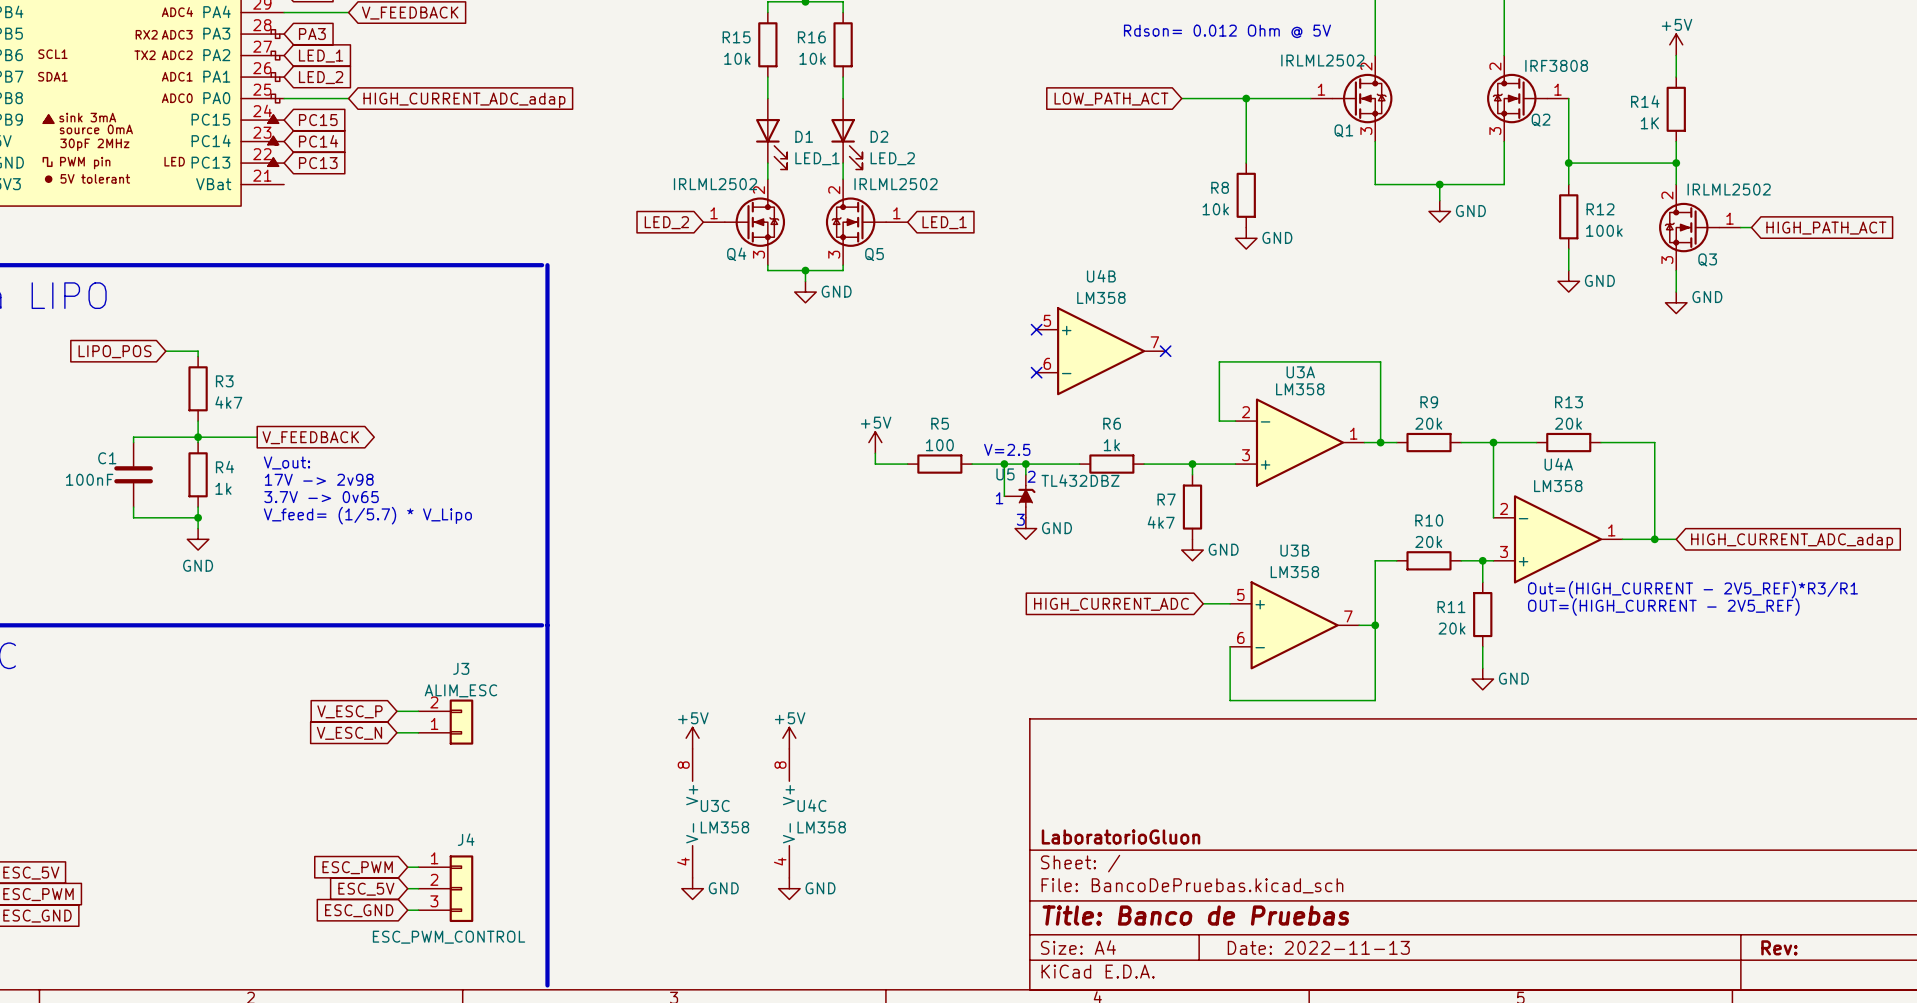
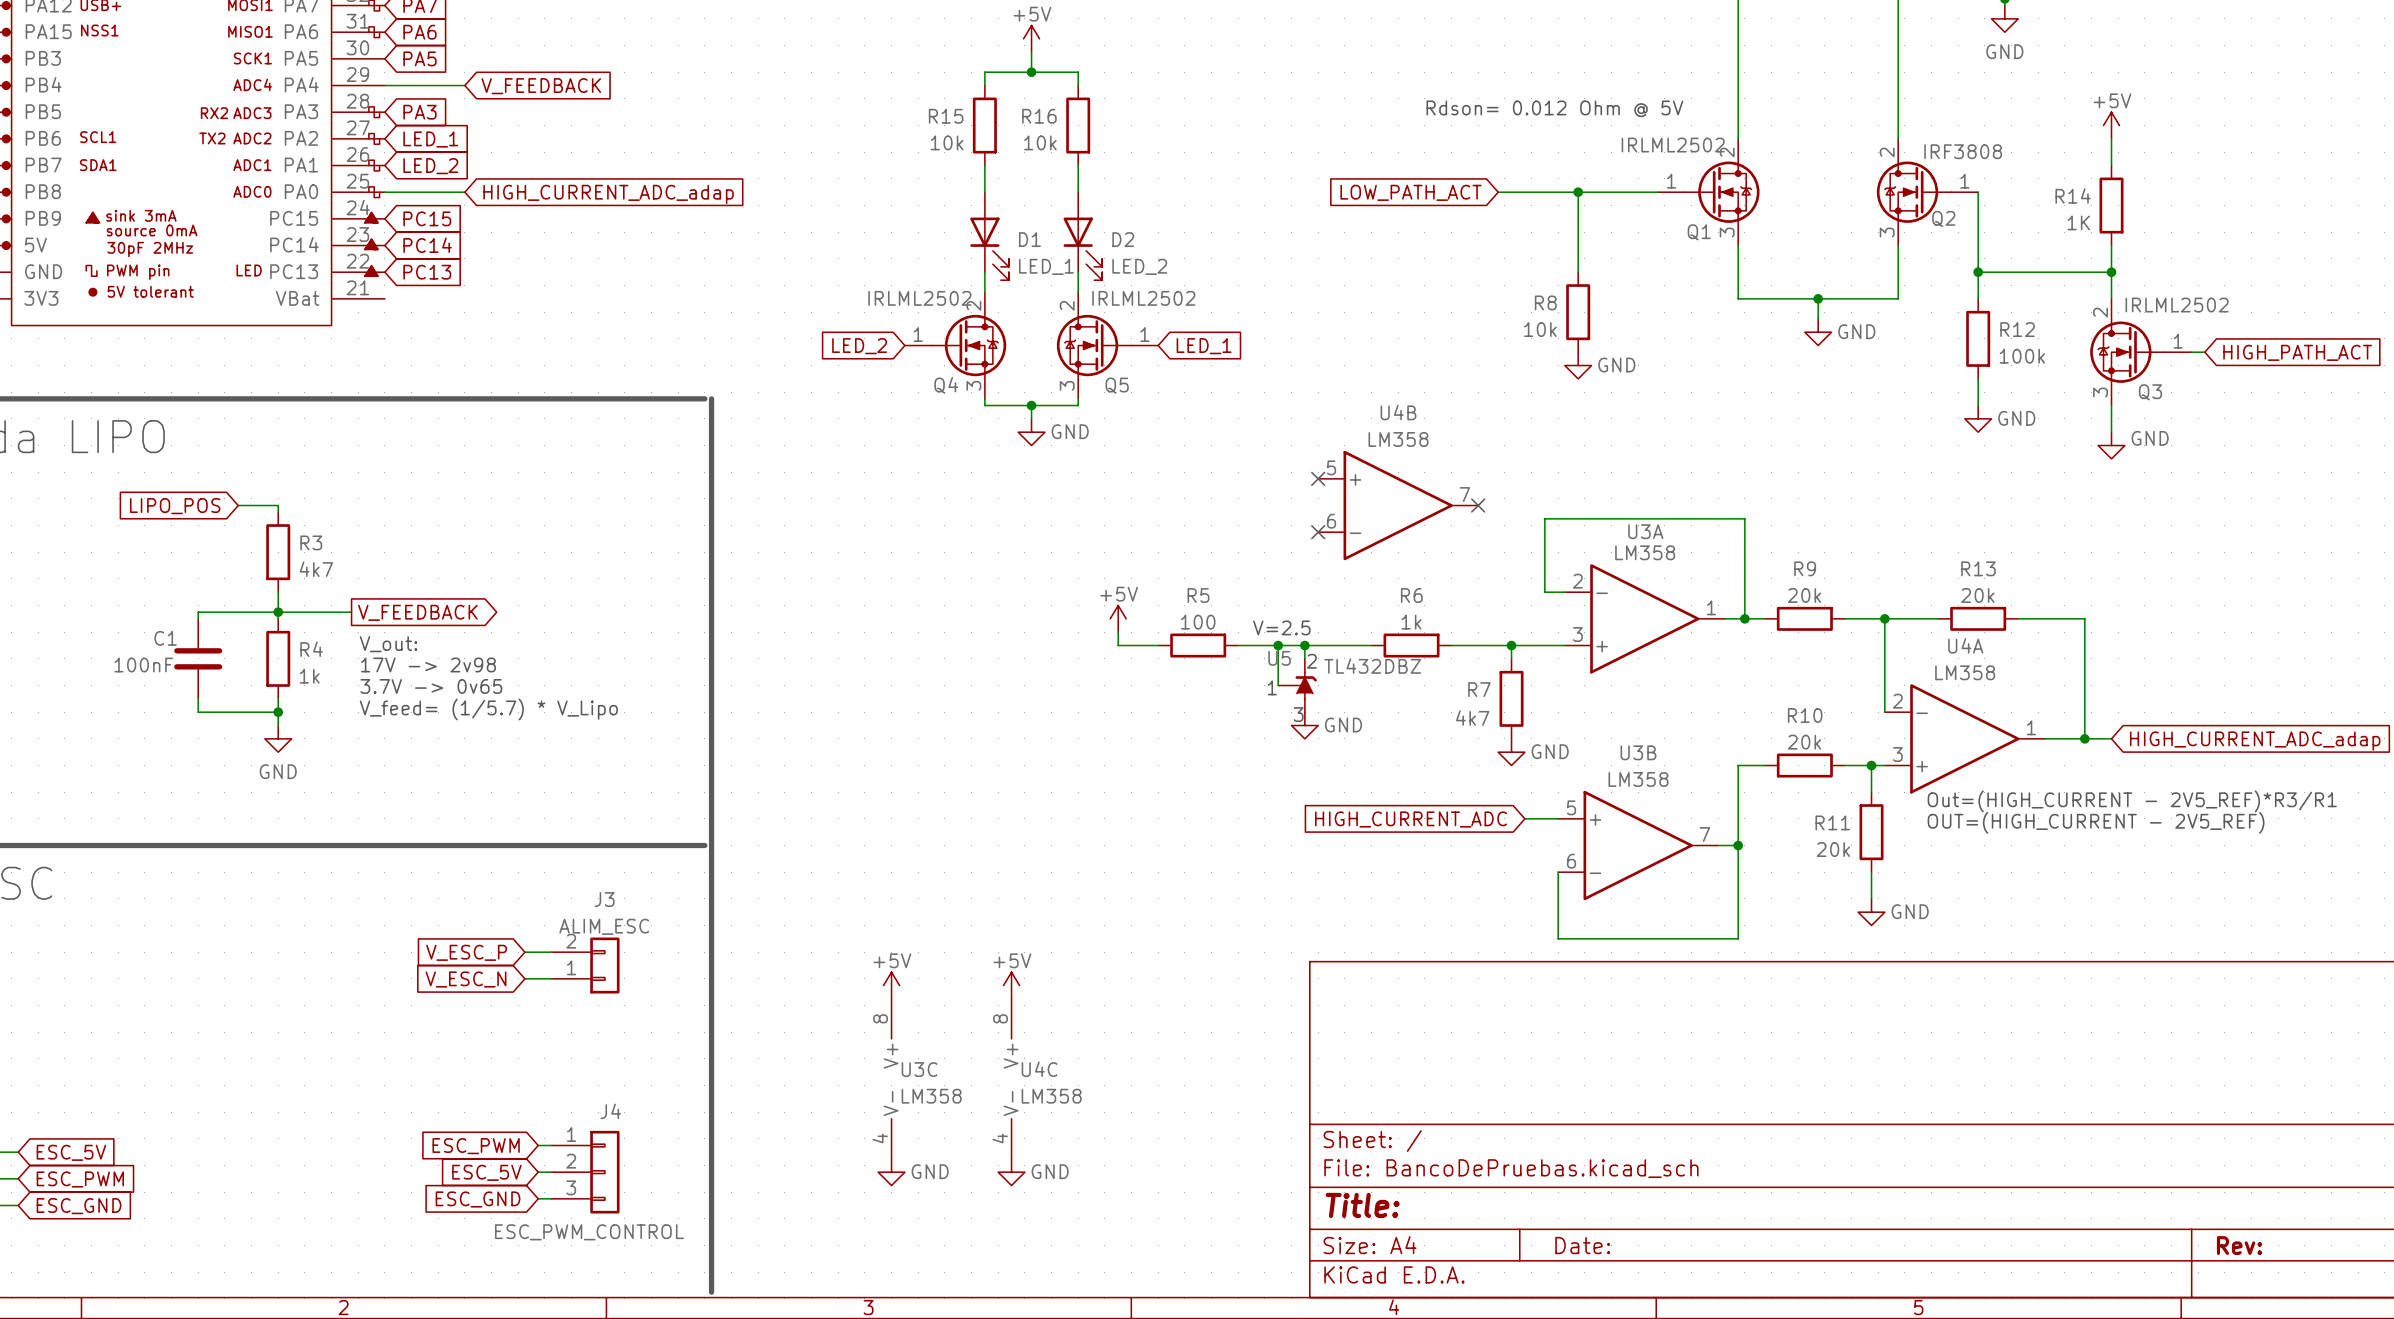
title block: LaboratorioGluon (1120, 836) -> none
title block: Title: Banco de Pruebas (1195, 915) -> Title: (1362, 1205)
title block: Date: 2022-11-13 (1318, 947) -> Date: (1582, 1245)

